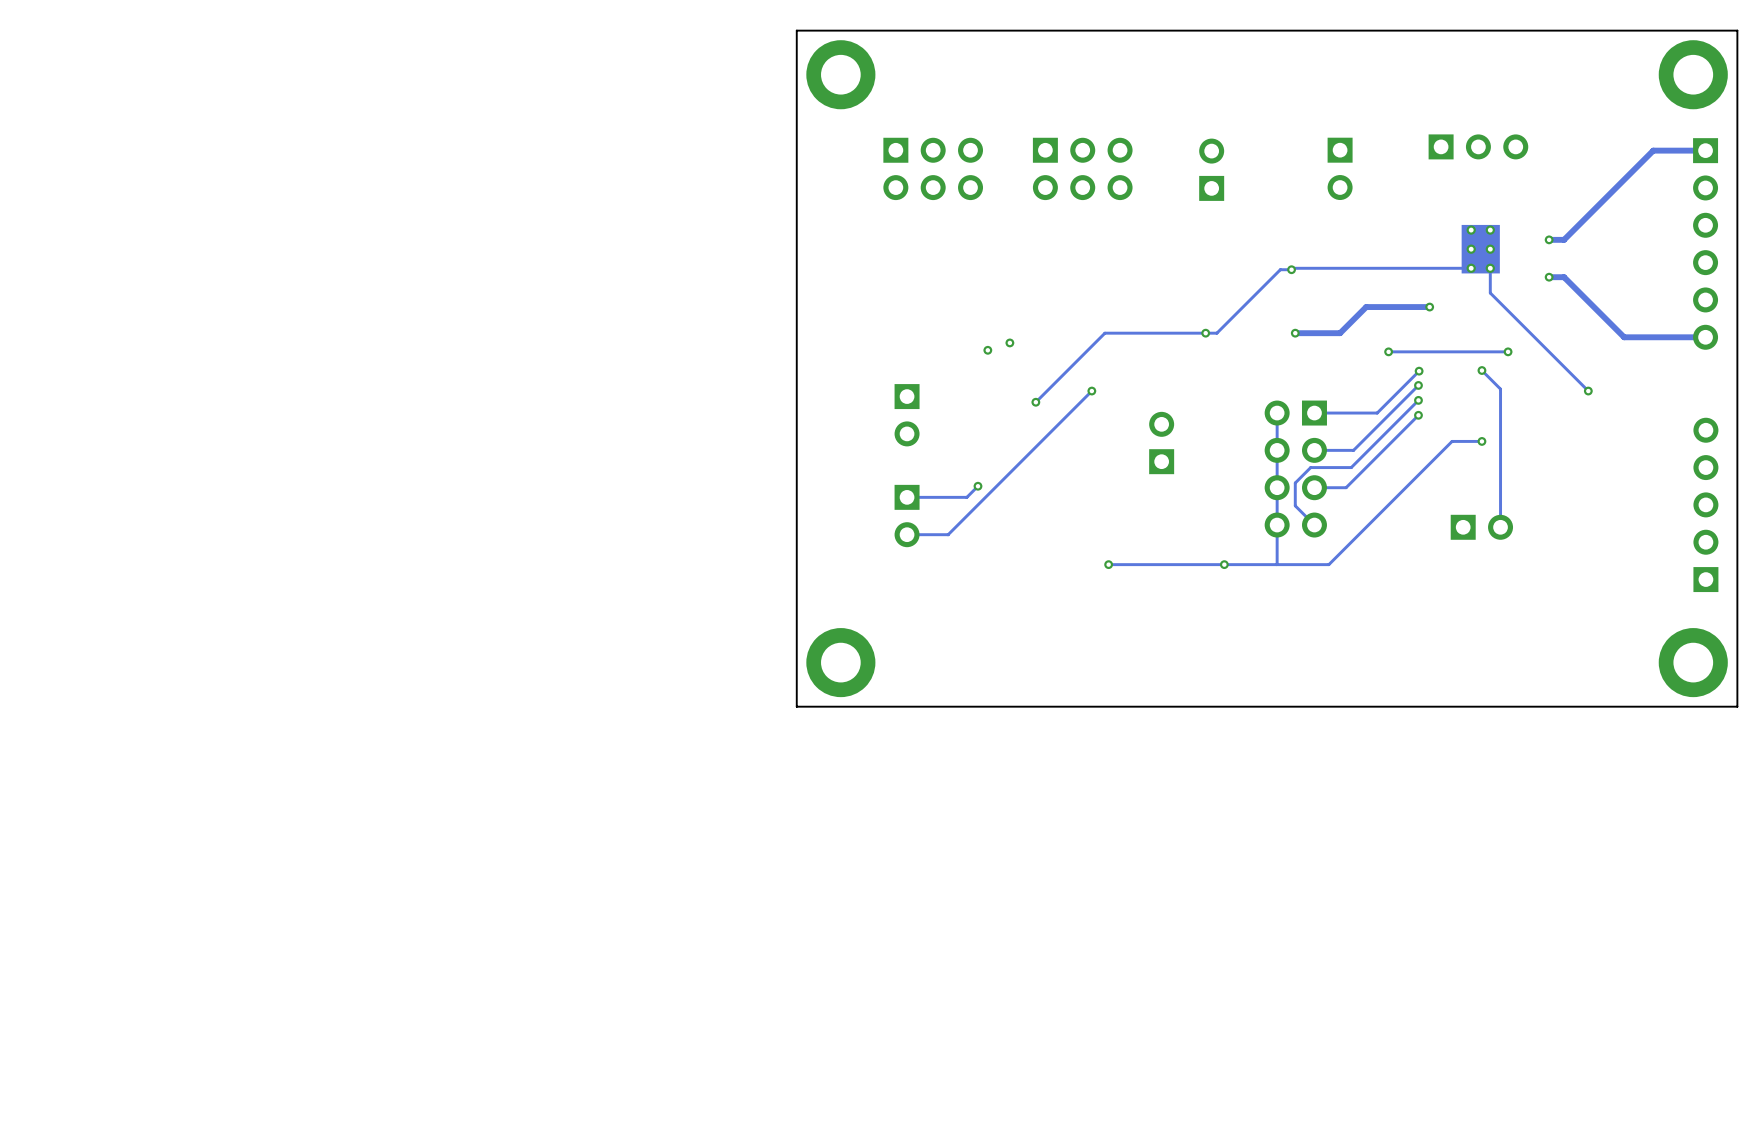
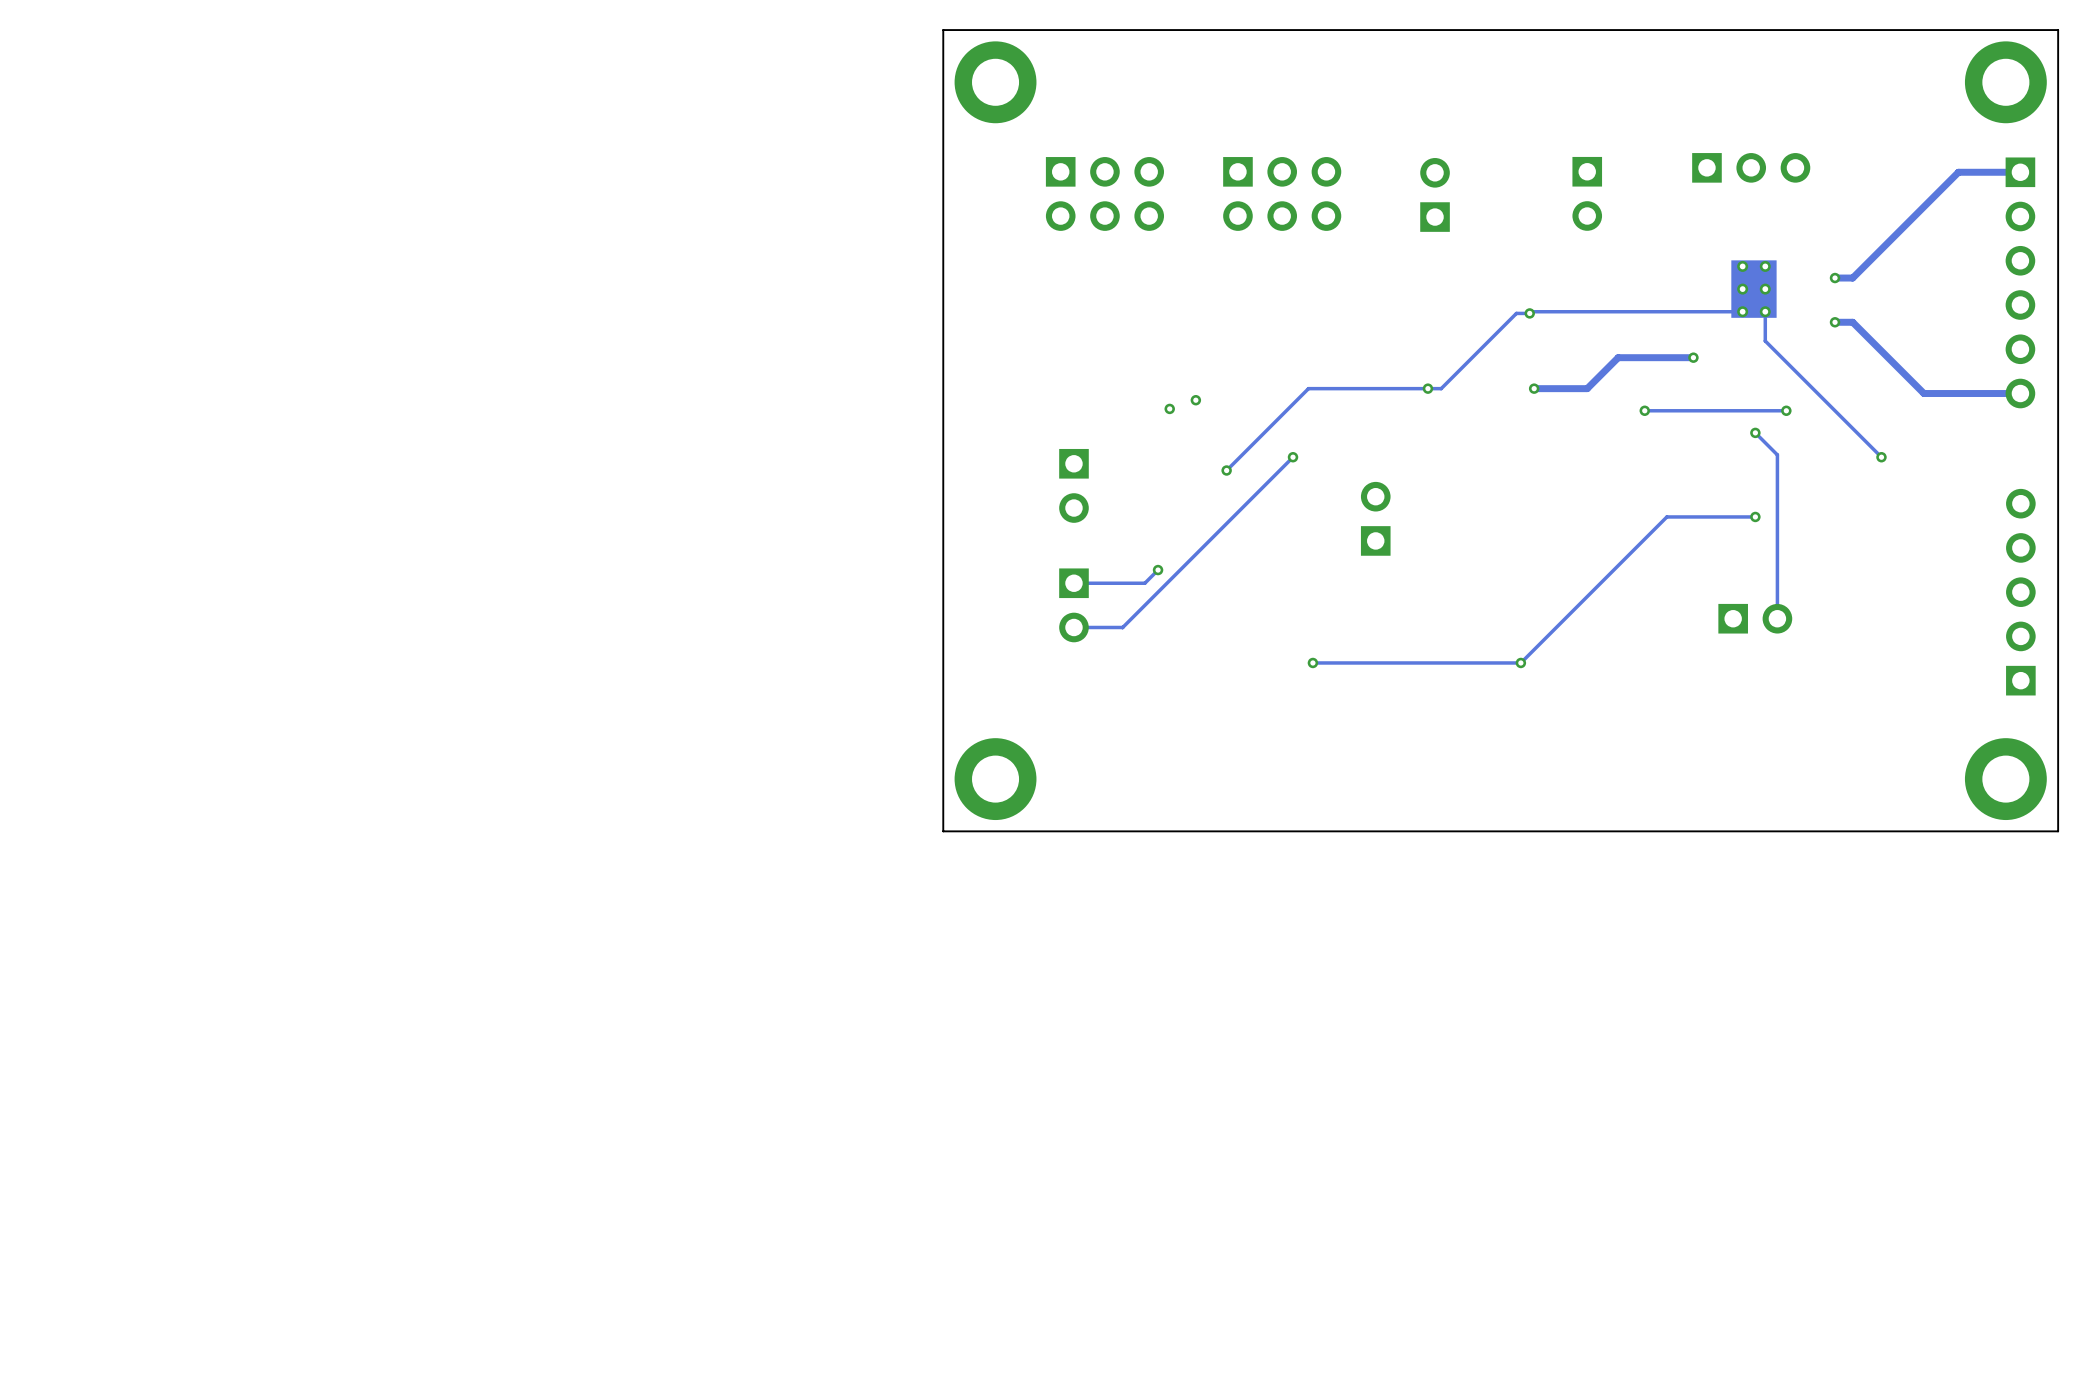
track: (1419, 371) (1377, 413) (1314, 413) -> none
via: (1419, 371) -> none
track: (1418, 385) (1353, 450) (1314, 450) -> none
via: (1418, 385) -> none
track: (1418, 400) (1351, 467) (1310, 467) (1295, 482) (1295, 505) (1314, 525) -> none
via: (1418, 400) -> none
track: (1277, 413) (1276, 564) -> none
track: (1418, 415) (1346, 487) (1314, 487) -> none
via: (1418, 415) -> none
track: (1452, 441) (1328, 564) (1284, 564) -> (1719, 516) (1666, 516) (1520, 662)
part: (1295, 469) -> none
via position: (1224, 564) -> (1520, 662)

